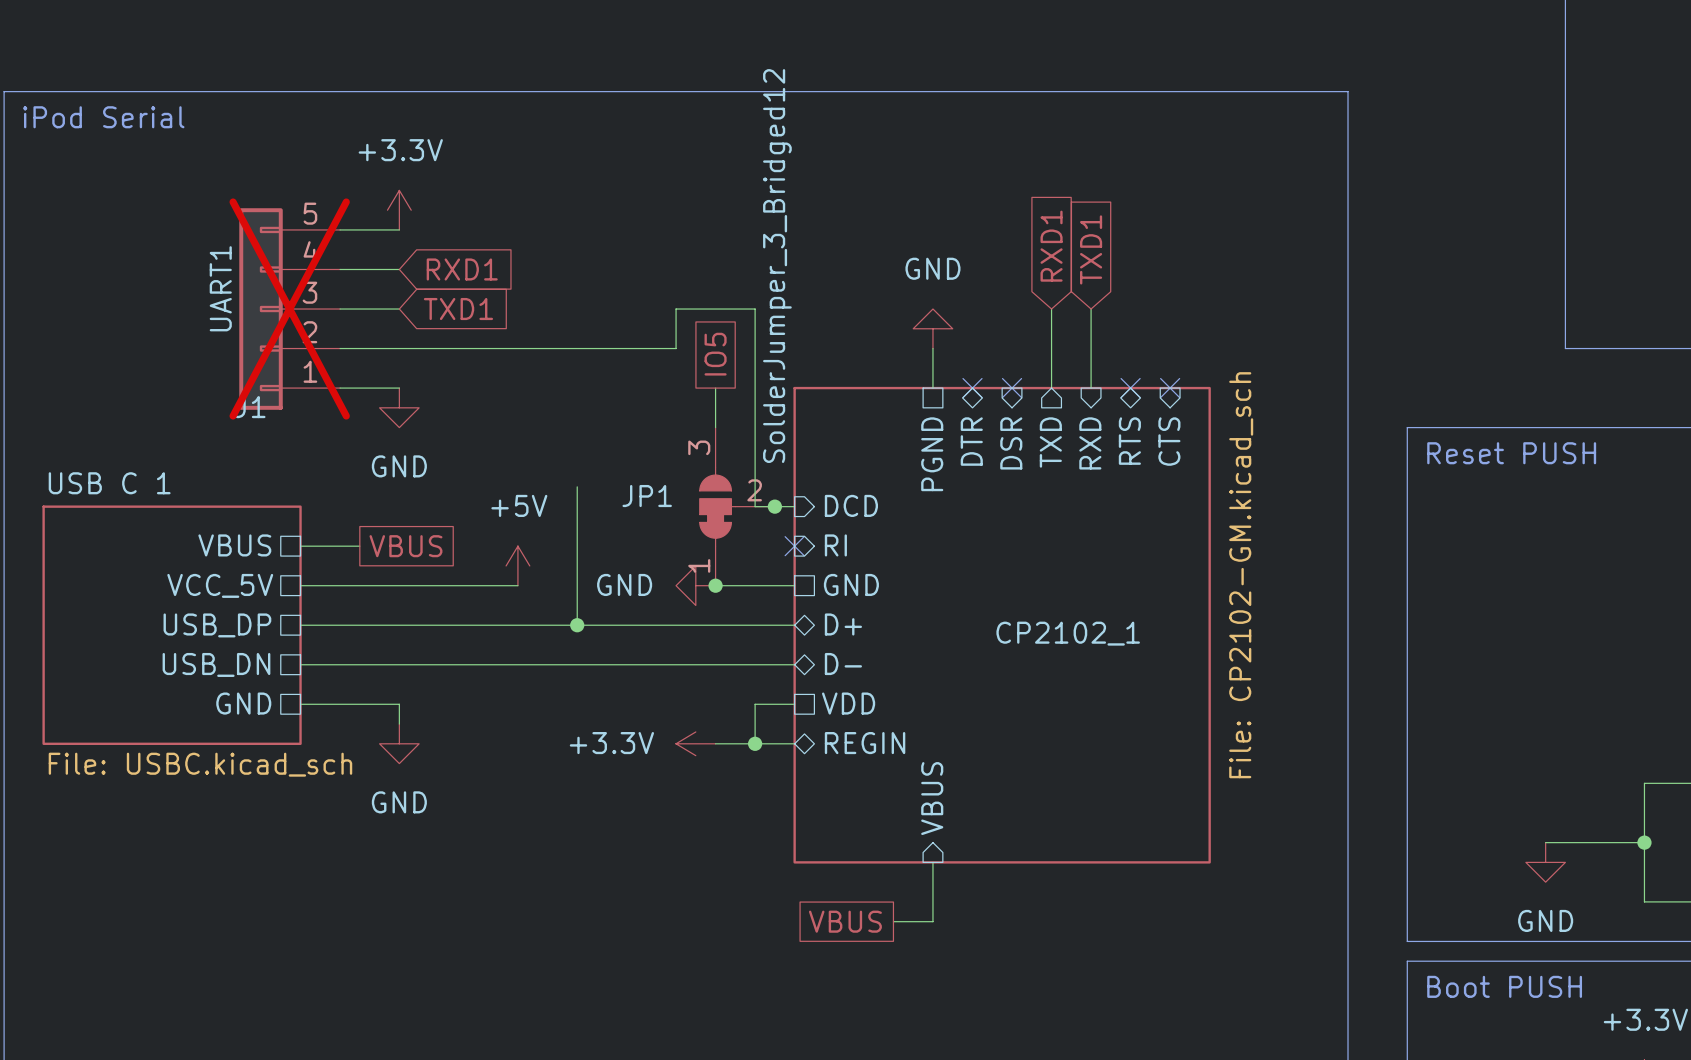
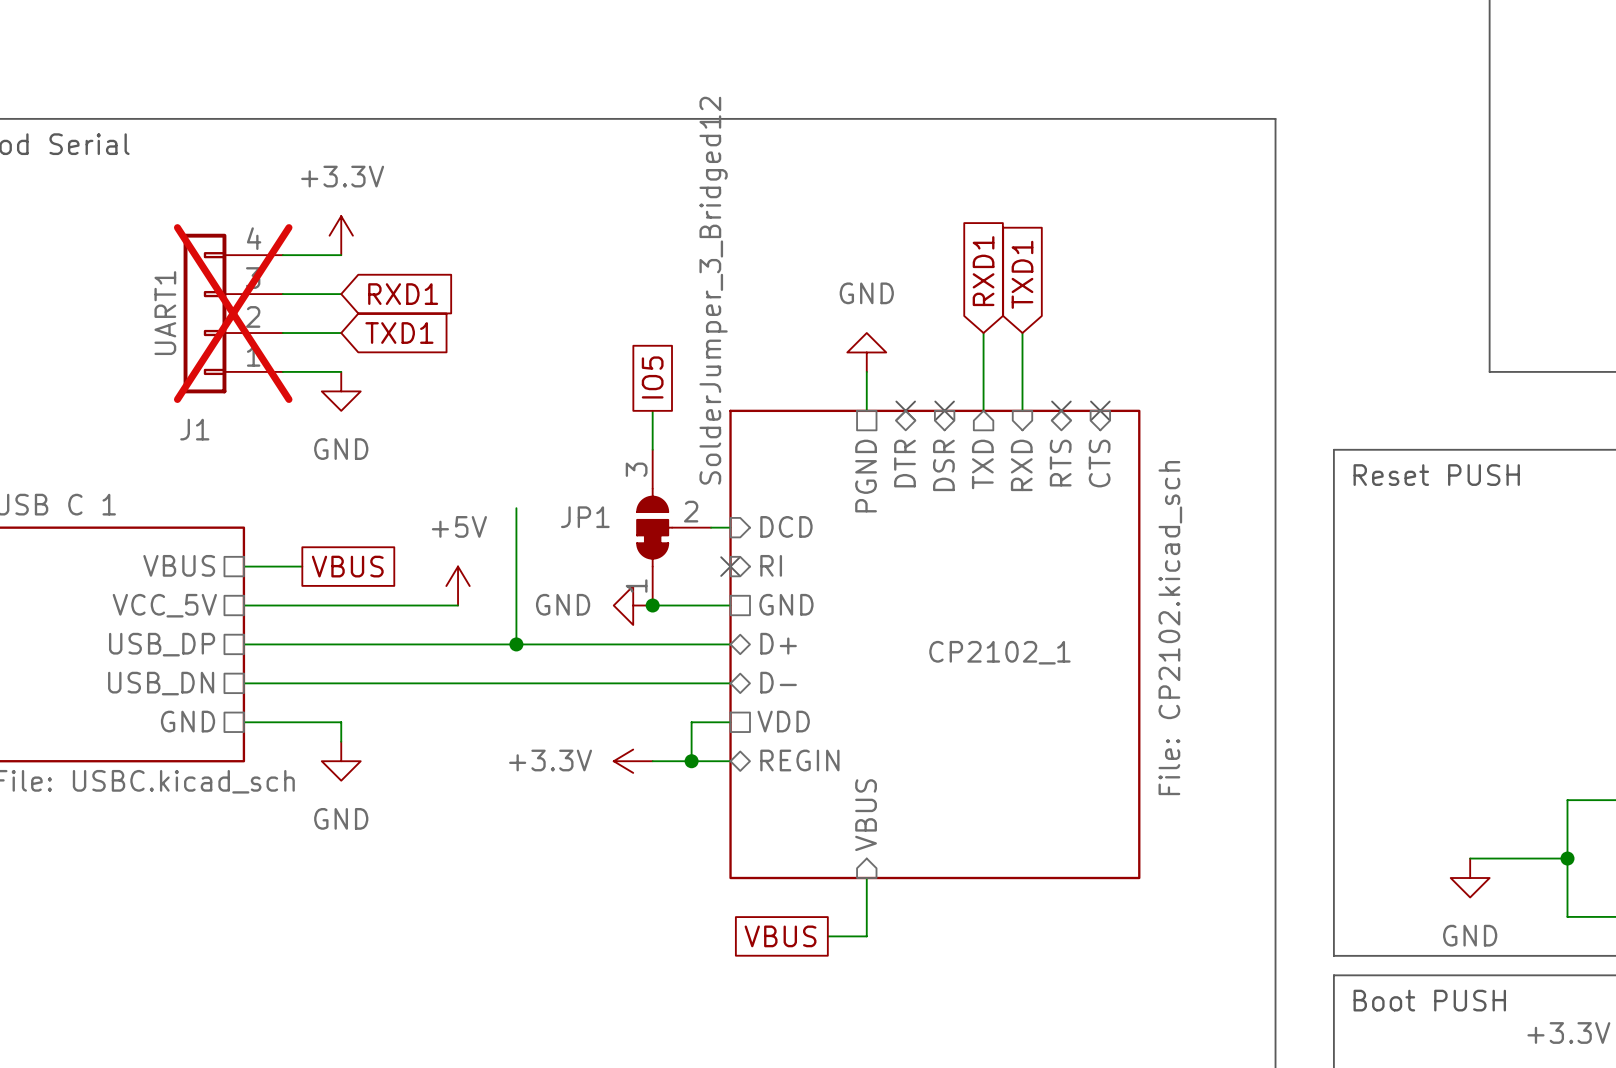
J1 symbol: [239, 208, 341, 410] -> [183, 233, 283, 394]
wire: (399, 348) (676, 348) (676, 309) (755, 309) (755, 506) (774, 506) -> none
wire: (340, 388) (399, 388) -> none
power symbol position: GND (399, 407) -> GND (341, 391)
junction: (774, 506) -> none
sheet CP2102_1 value: File: CP2102-GM.kicad_sch (1241, 575) -> File: CP2102.kicad_sch (1170, 628)

